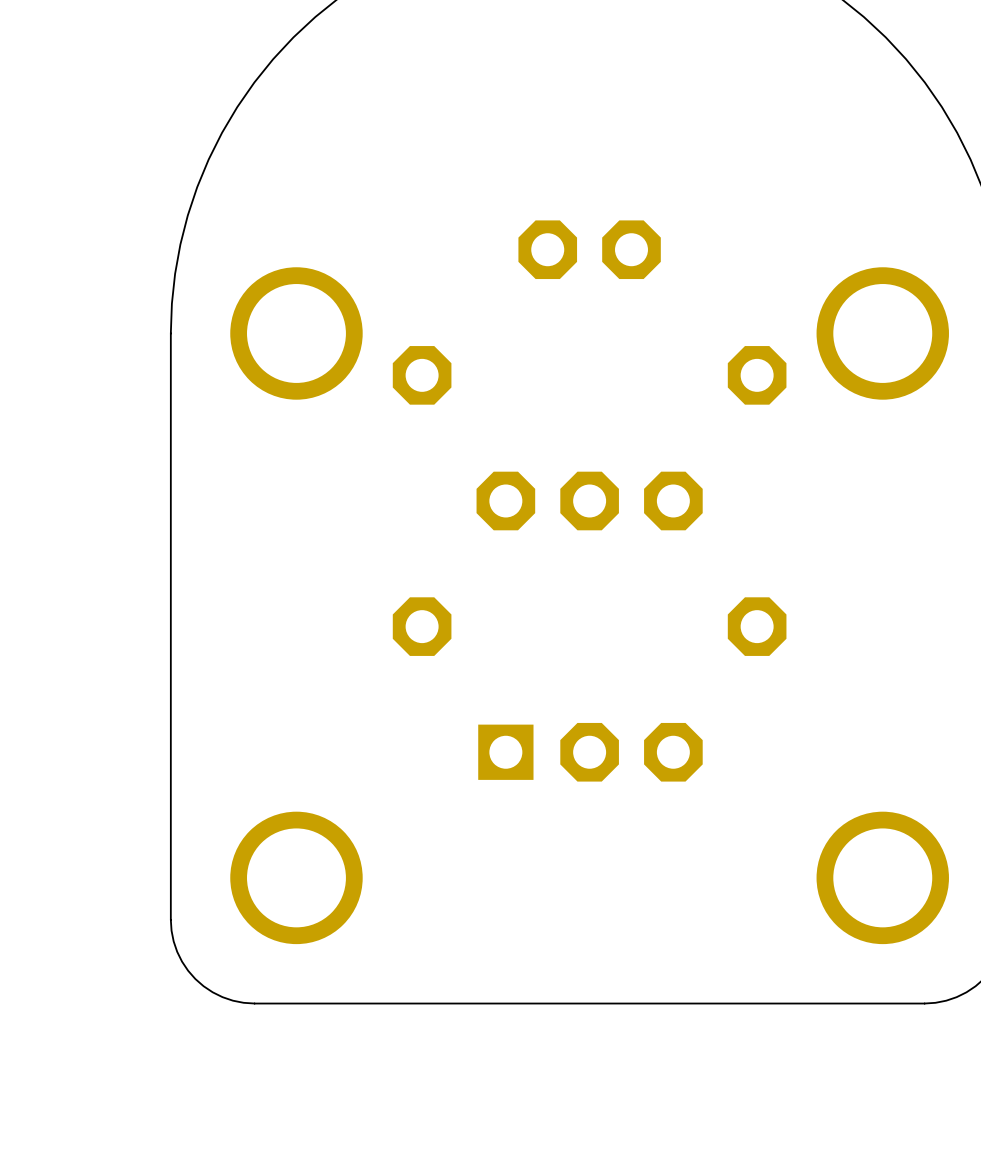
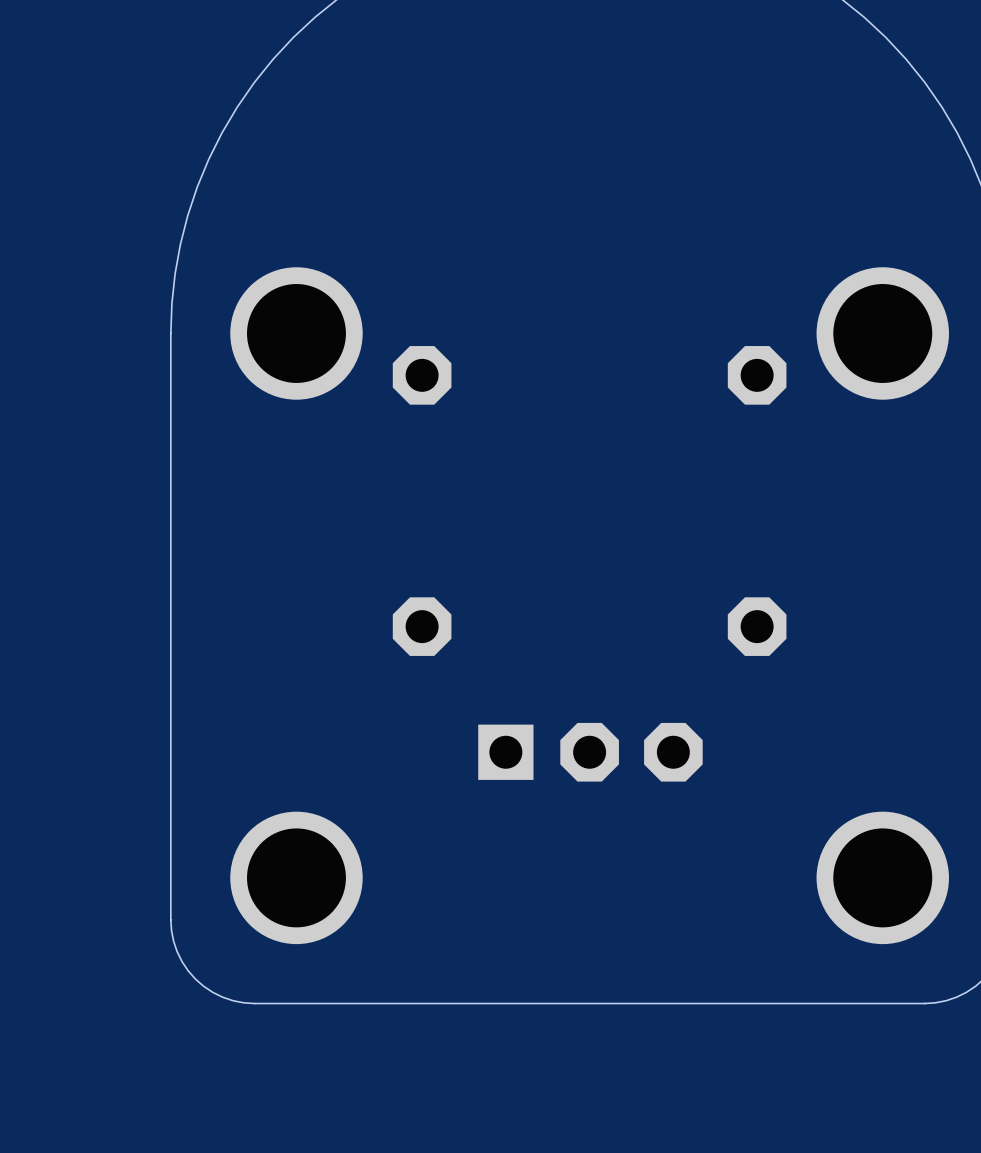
part: (589, 249) -> none
part: (589, 500) -> none

